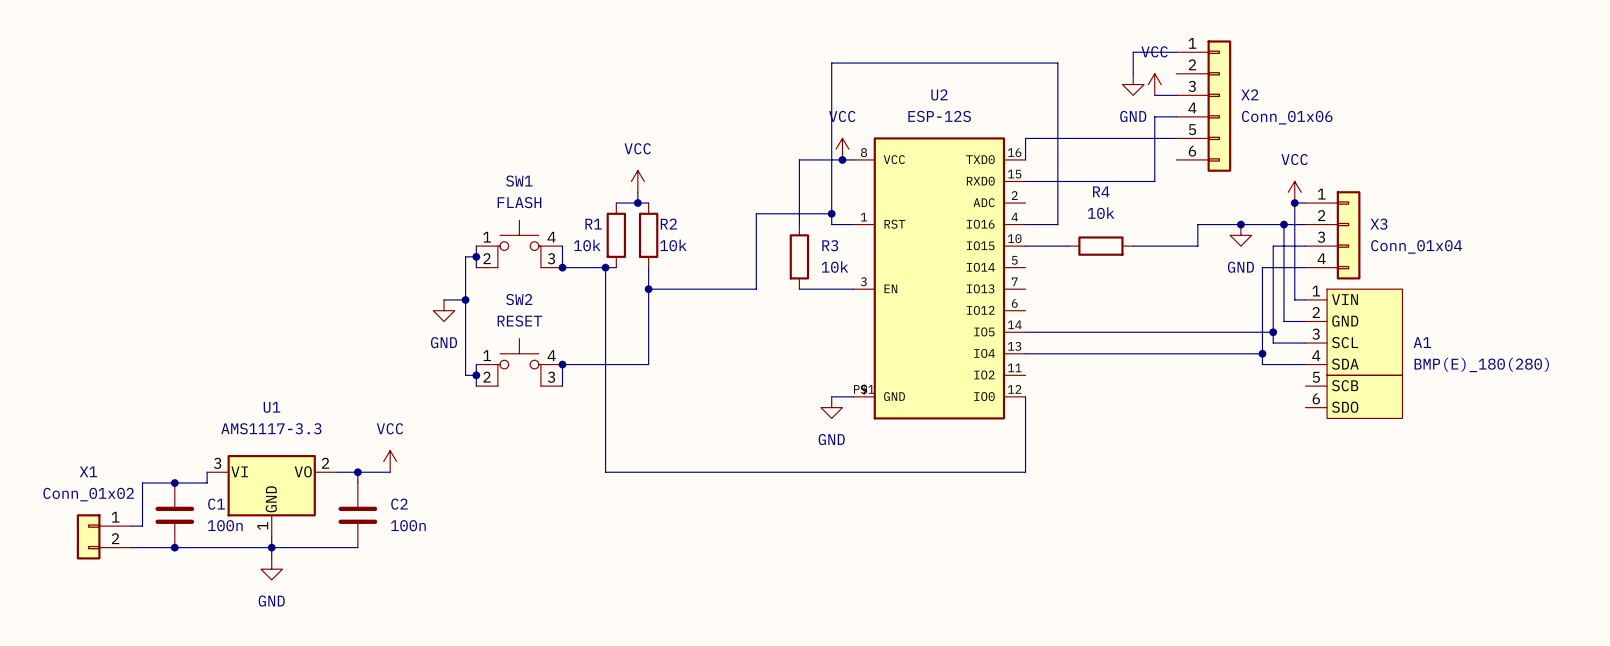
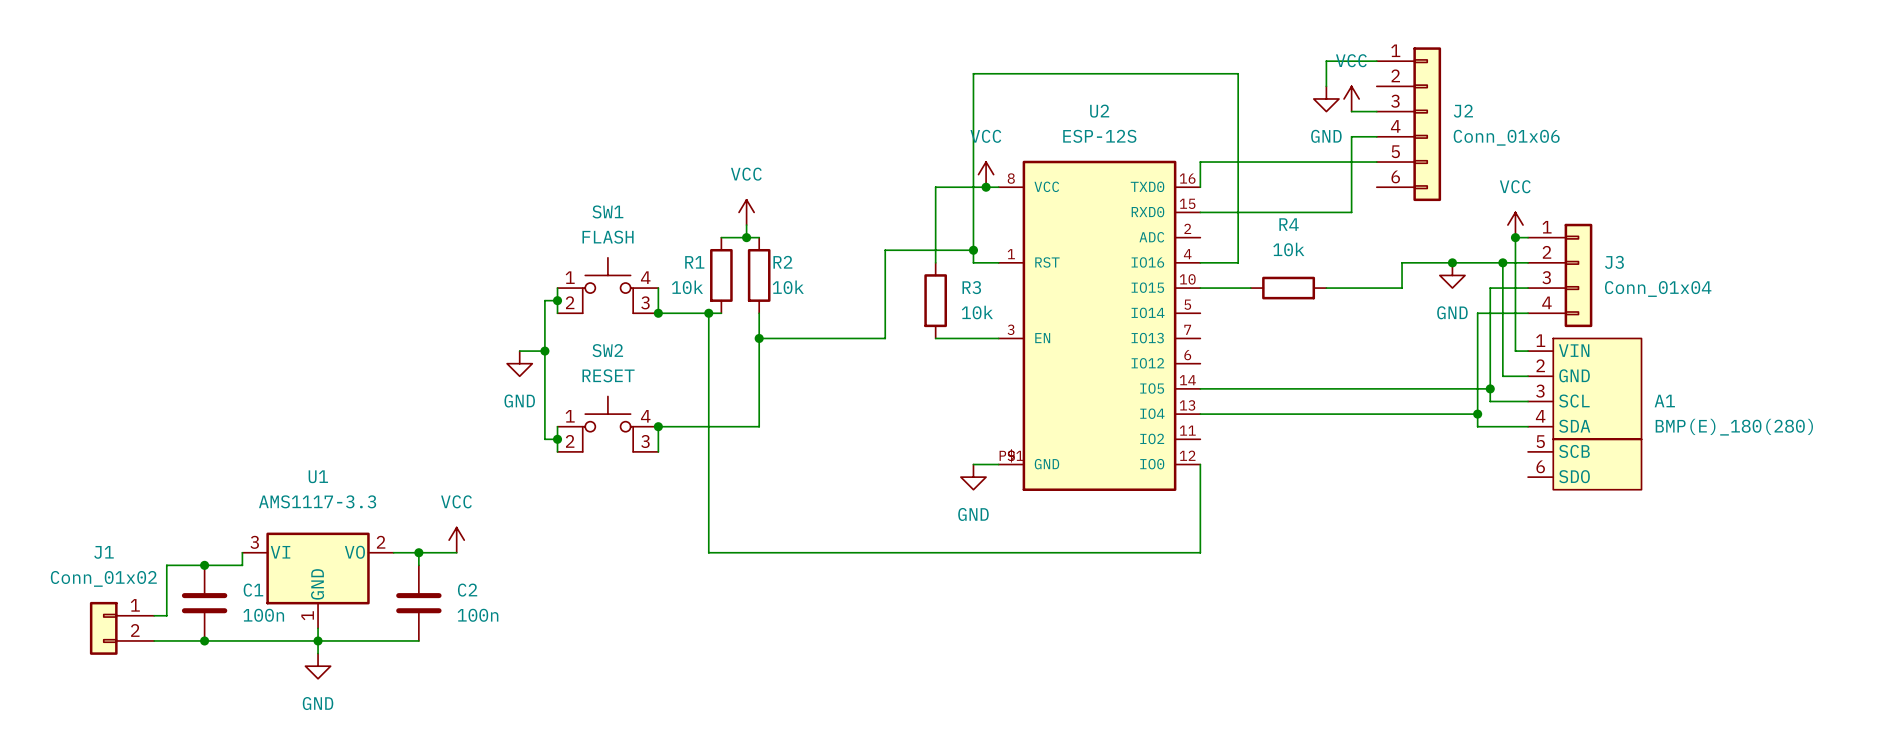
X2 name: X2 (1249, 94) -> J2 (1463, 111)
X3 name: X3 (1378, 224) -> J3 (1614, 262)
X1 name: X1 (88, 471) -> J1 (104, 552)

